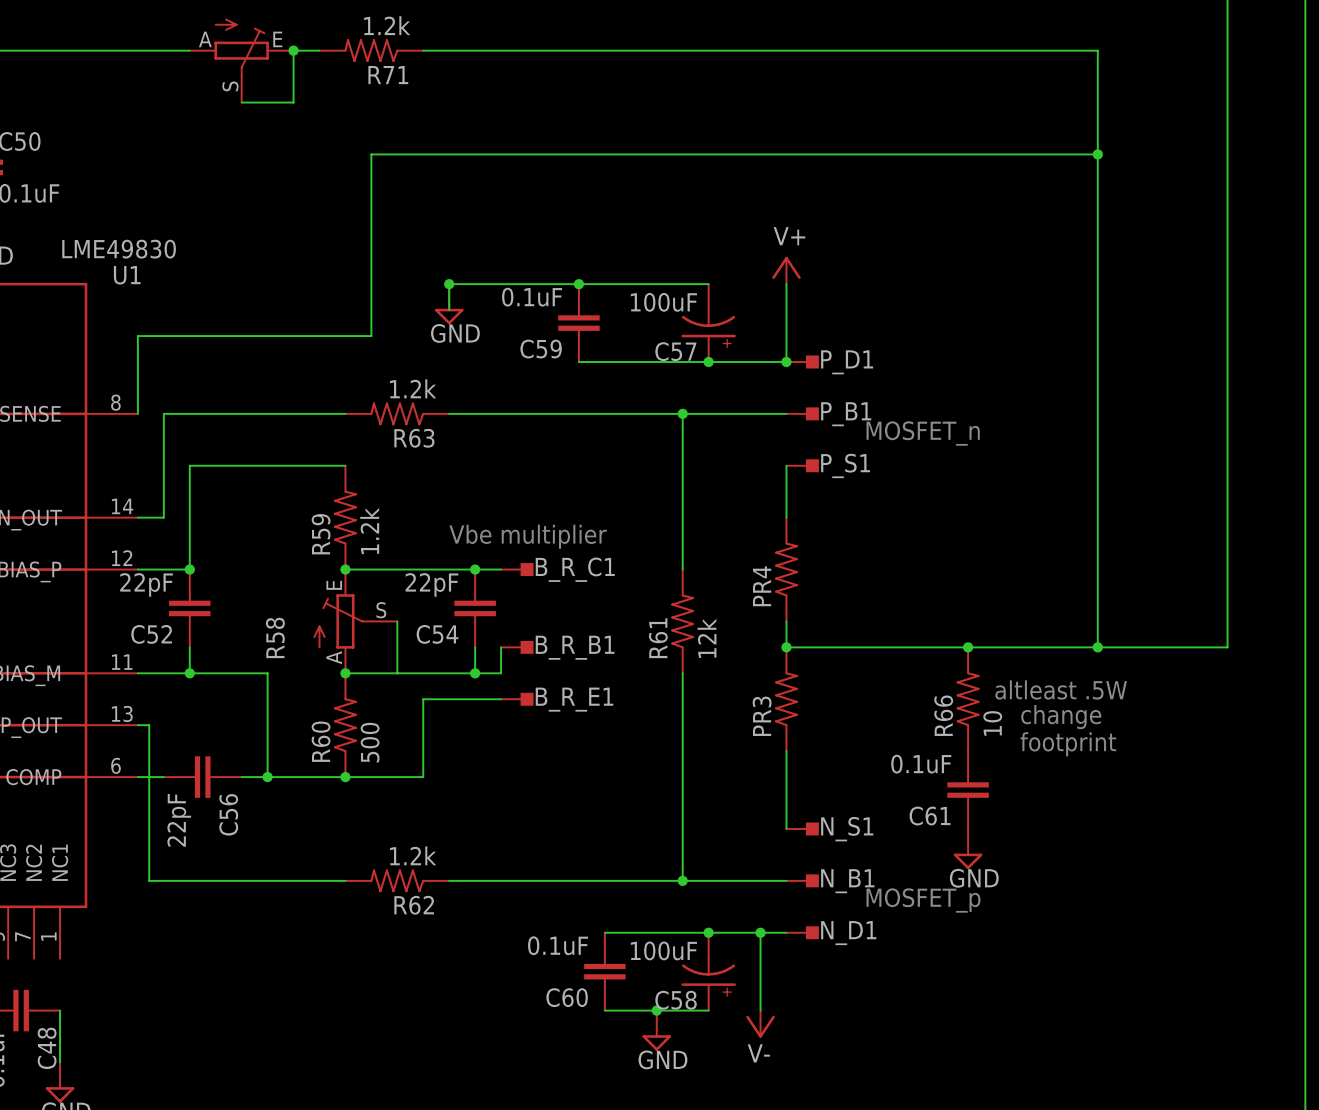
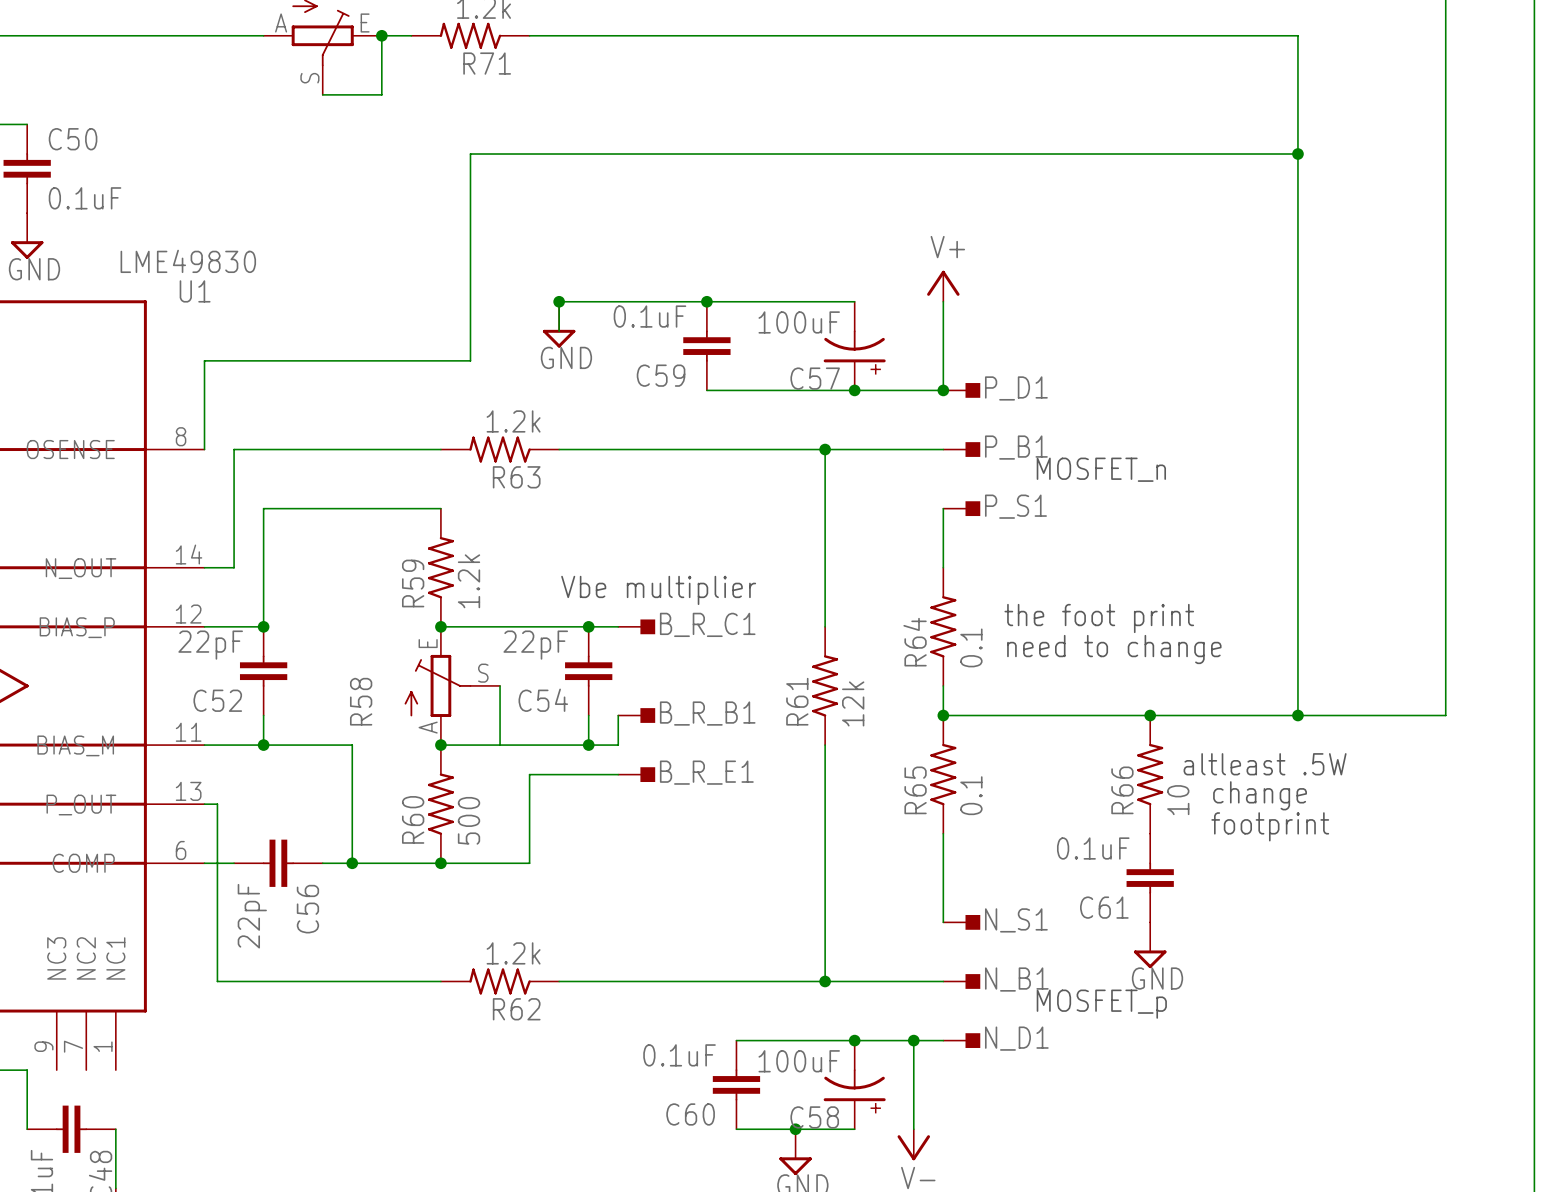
text: none -> the foot print (1099, 618)
PR4 name: PR4 (762, 586) -> R64 (915, 642)
text: none -> need to change (1114, 649)
PR4 value: none -> 0.1 (971, 647)
PR3 name: PR3 (762, 716) -> R65 (915, 790)
PR3 value: none -> 0.1 (971, 795)

